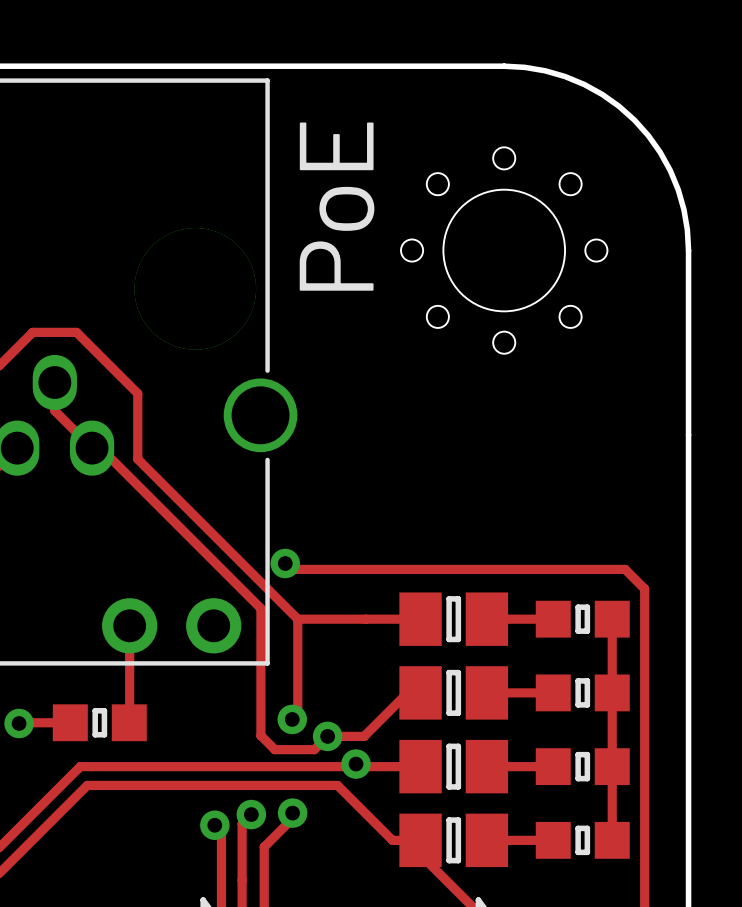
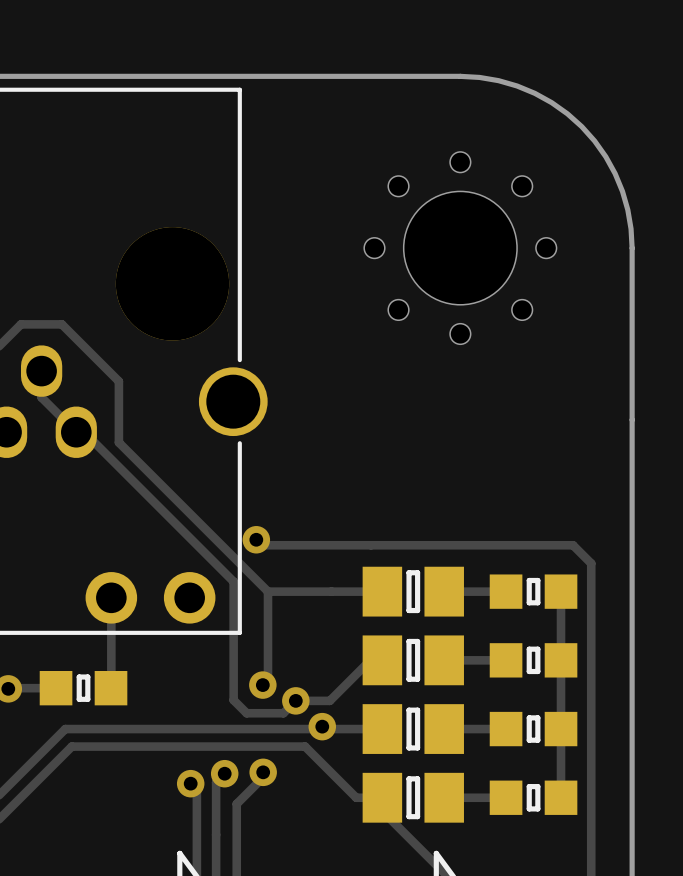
text: PoE (337, 206) -> none

